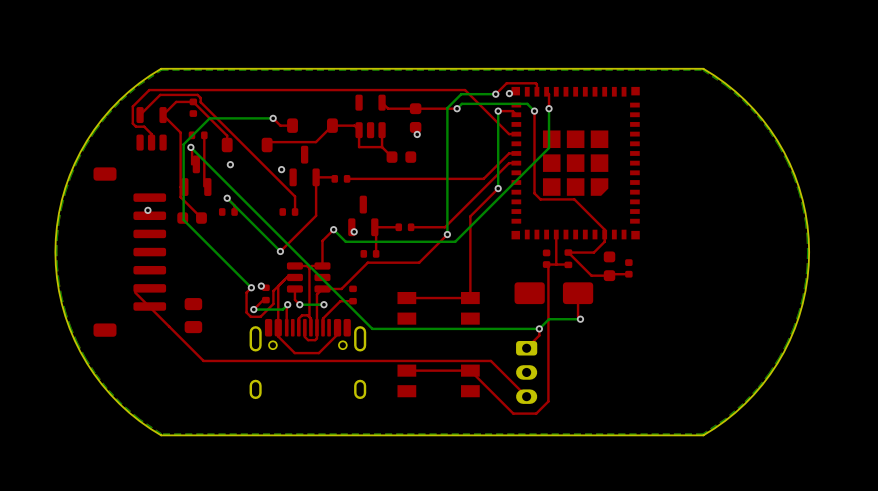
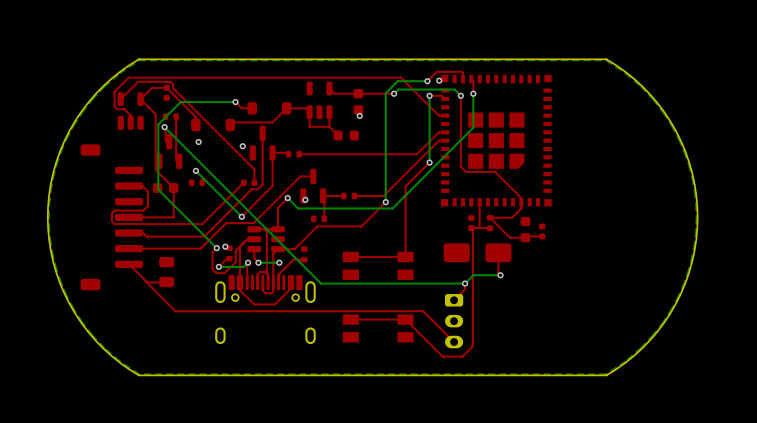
top track: none -> (262, 133) (262, 184) (257, 189) (251, 189) (204, 236) (146, 236) (143, 232) (129, 232)
top track: none -> (313, 176) (300, 176) (253, 223) (226, 223) (200, 248) (129, 248)
via: (147, 210) -> none
top track: none -> (243, 182) (202, 224) (114, 224) (111, 221) (111, 213) (114, 210) (143, 210) (147, 206) (147, 191) (142, 186) (129, 186)
top track: none -> (173, 188) (173, 217) (129, 217)
top track: (135, 292) (169, 326) -> none
top track: none -> (129, 264) (146, 282) (166, 282)

